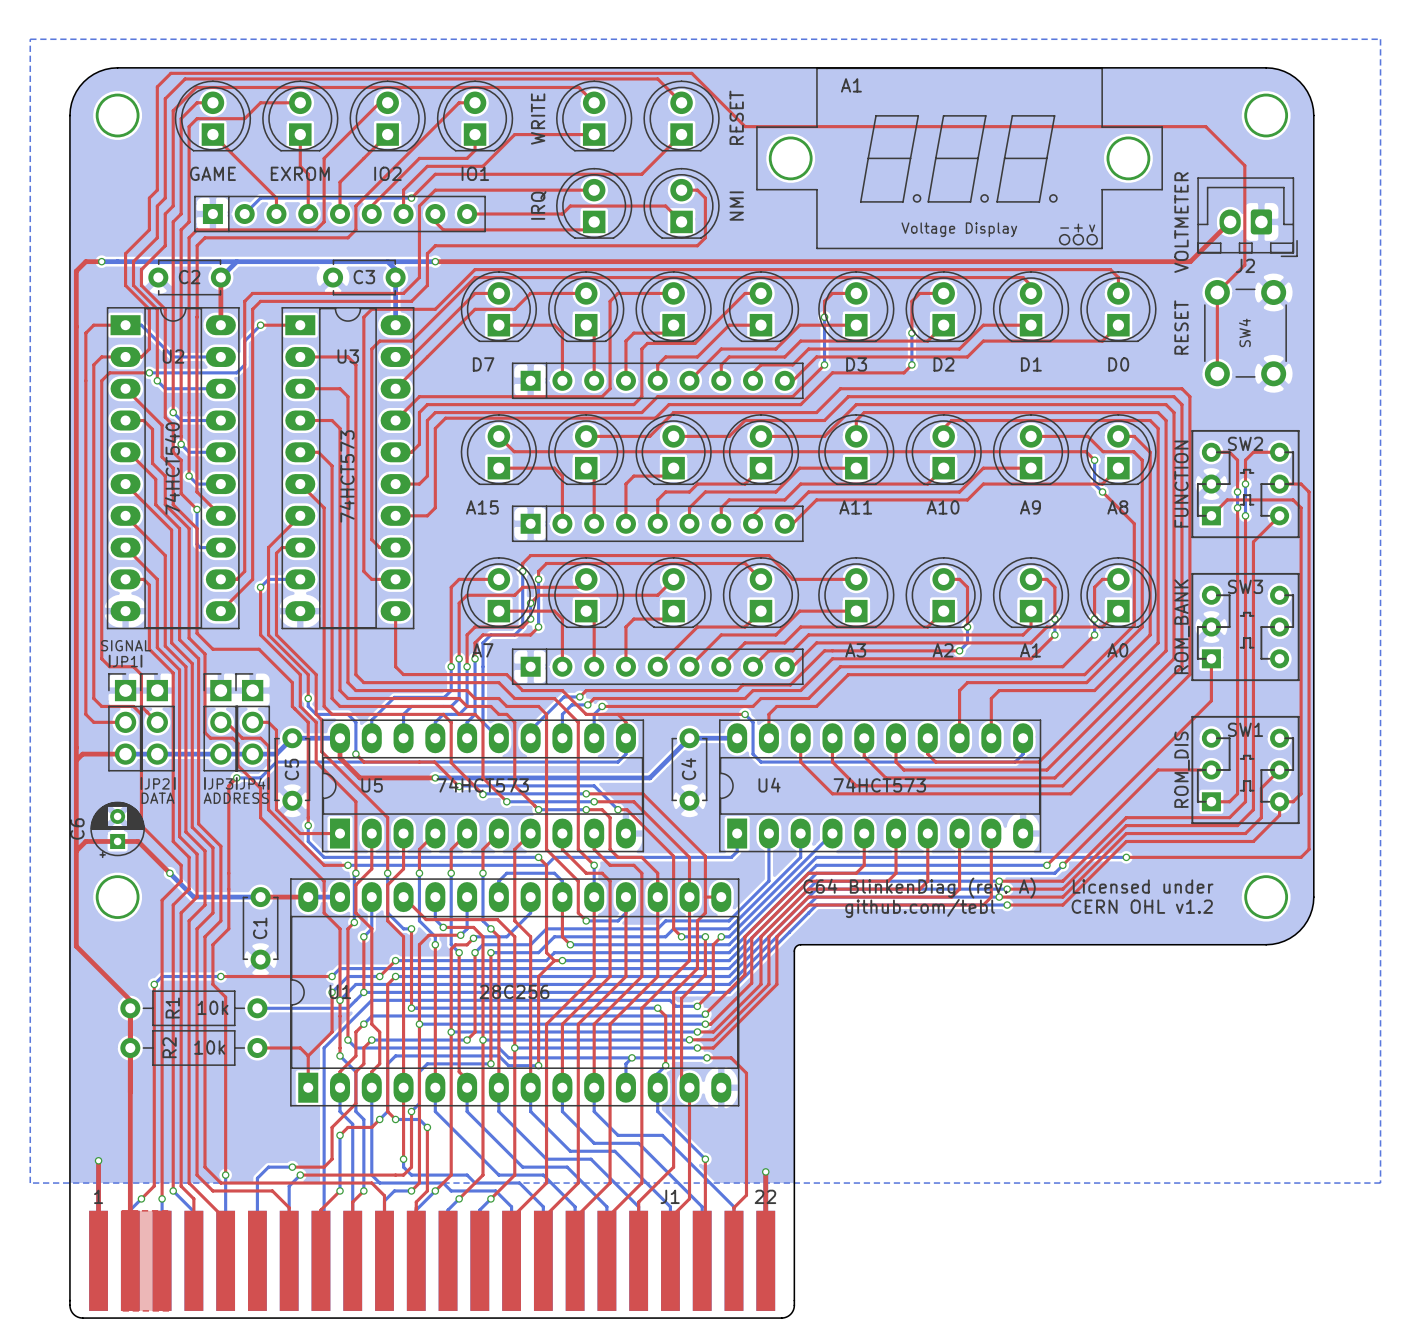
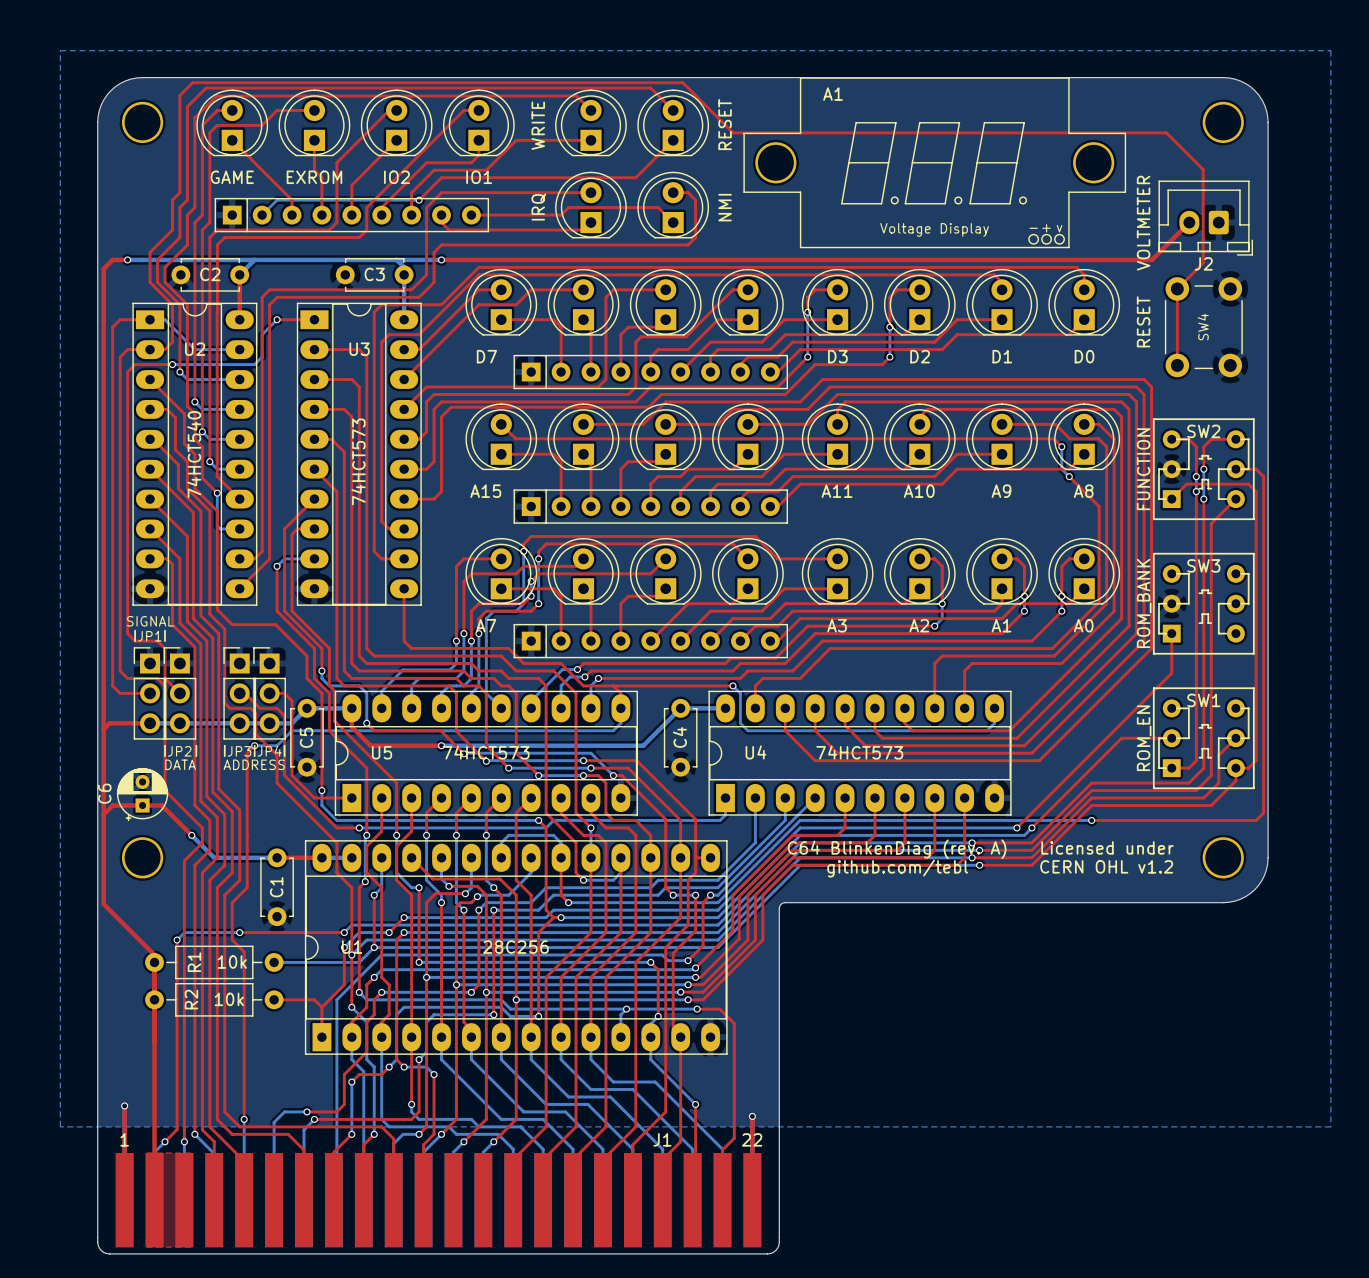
SW1 value: ROM_DIS (1182, 769) -> ROM_EN (1144, 738)

